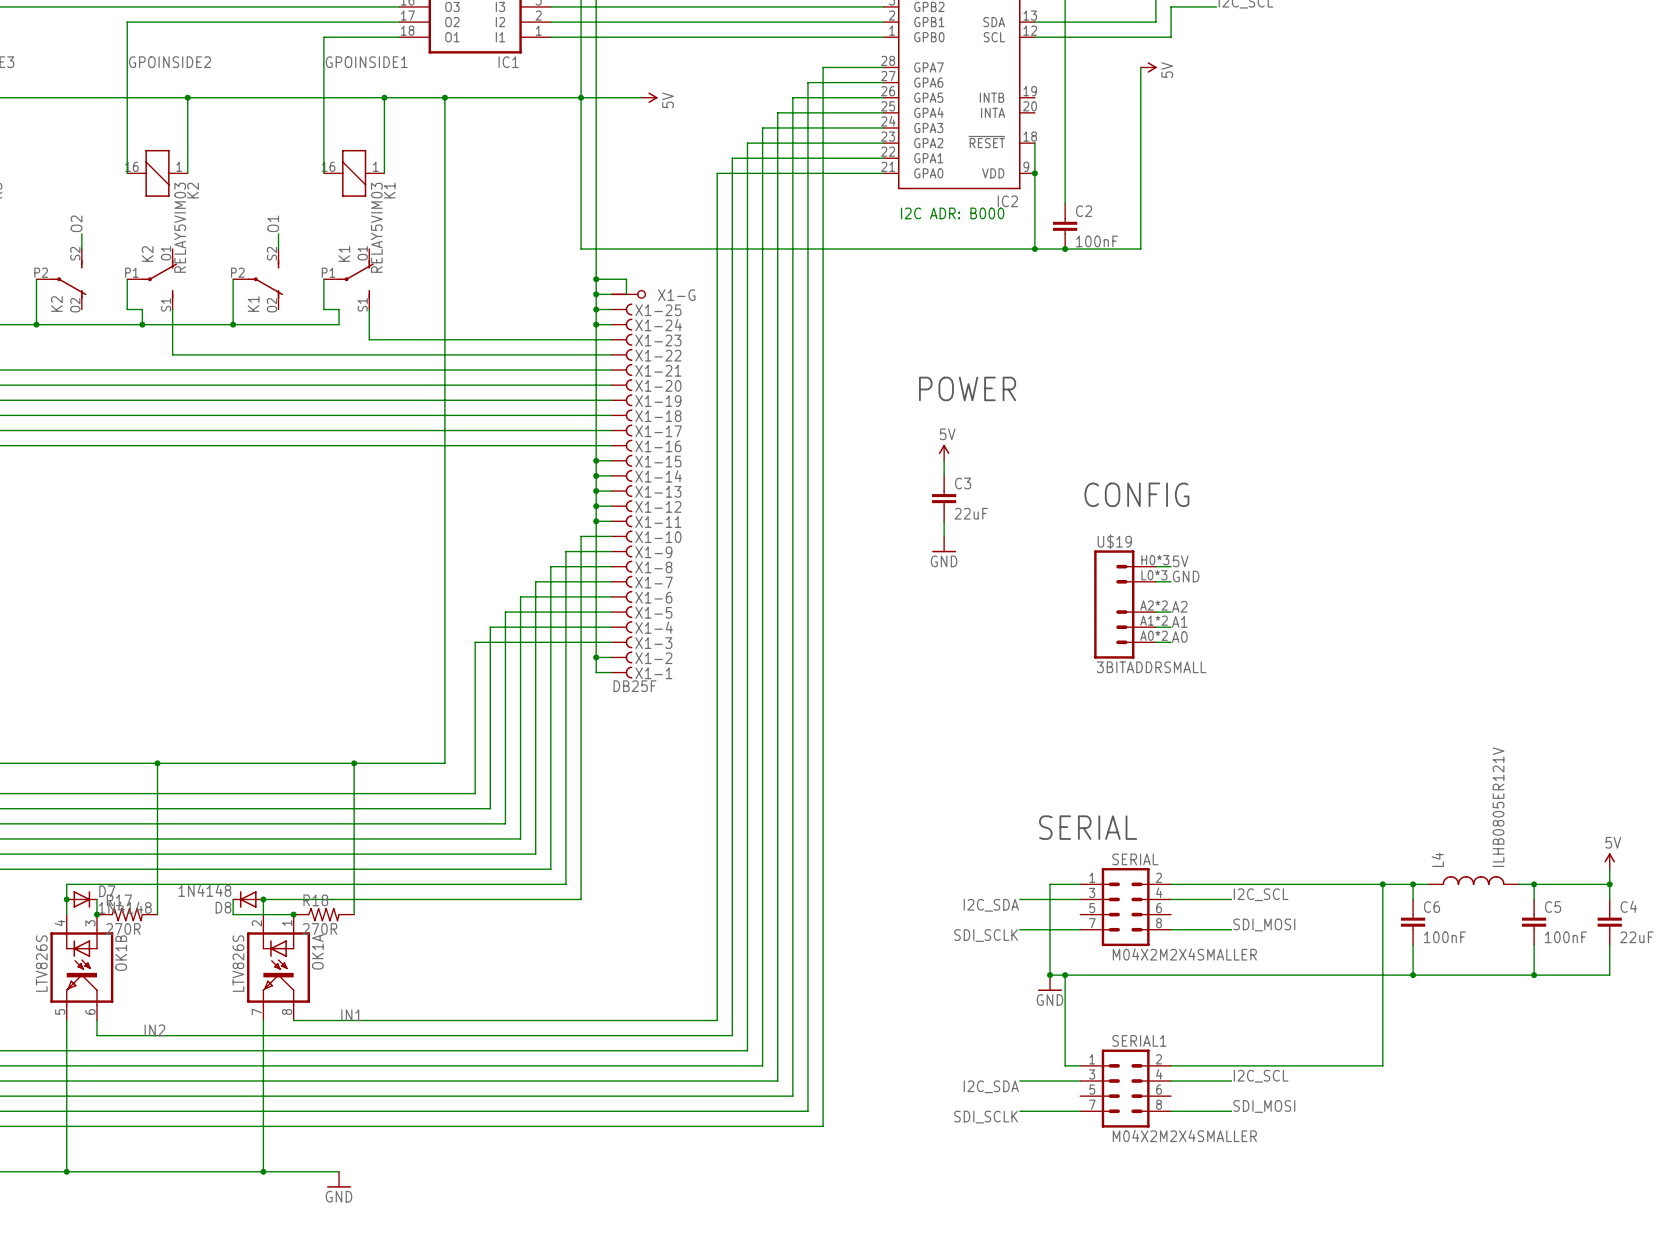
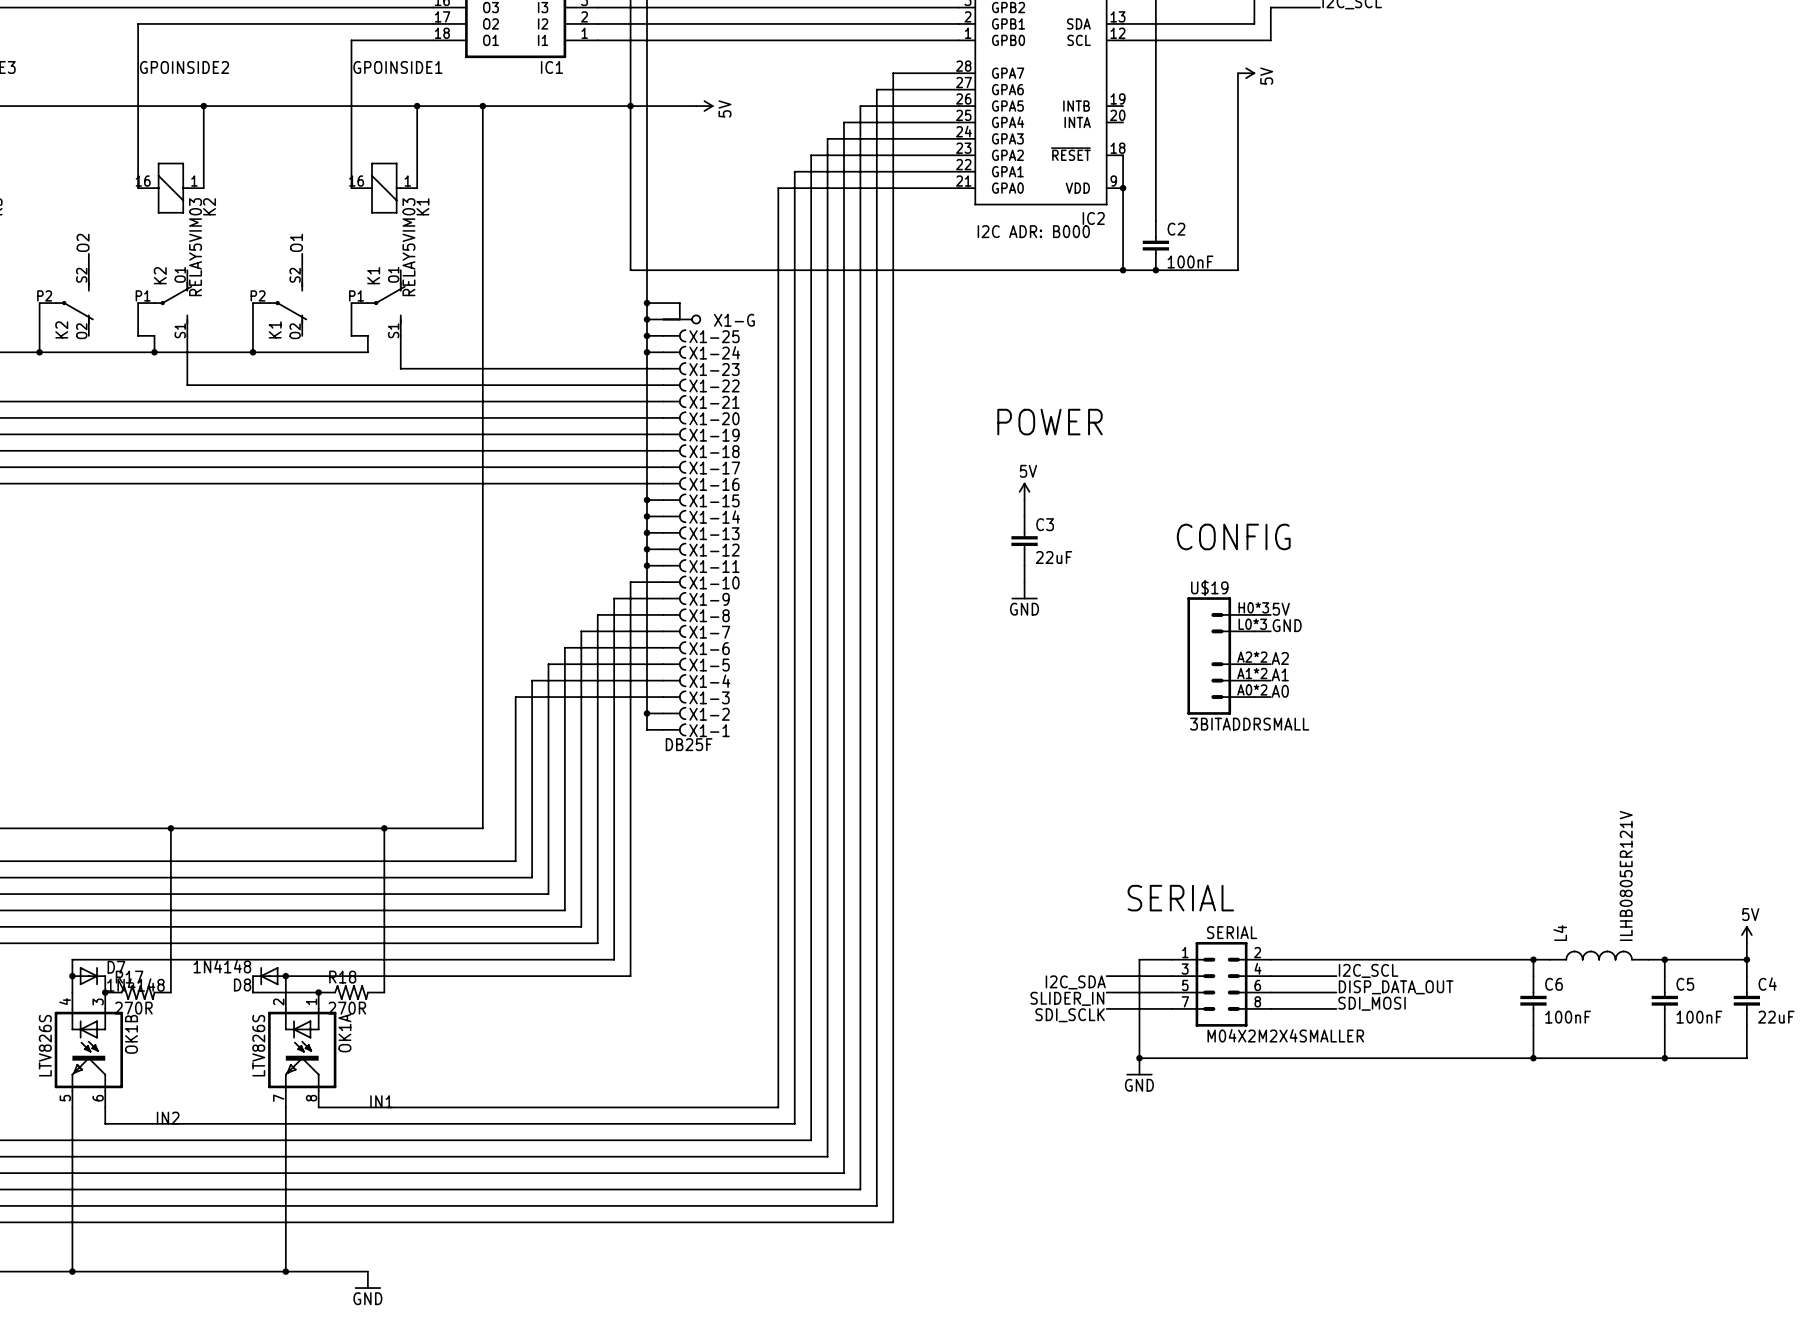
wire: (1382, 884) (1382, 1065) (1171, 1065) -> none
junction: (1382, 884) -> none
label: none -> DISP_DATA_OUT (1396, 987)
wire: none -> (1106, 992) (1172, 992)
wire: none -> (1270, 992) (1336, 992)
label: none -> SLIDER_IN (1067, 998)
wire: (1065, 975) (1065, 1065) (1080, 1065) -> none
junction: (1065, 975) -> none
label: I2C_SCL (1261, 1076) -> none
wire: (1019, 1081) (1080, 1081) -> none
wire: (1171, 1081) (1231, 1081) -> none
label: I2C_SDA (991, 1086) -> none
SERIAL1: M04X2M2X4SMALLER (1125, 1088) -> none
label: SDI_MOSI (1264, 1106) -> none
wire: (1019, 1111) (1080, 1111) -> none
wire: (1171, 1111) (1231, 1111) -> none
label: SDI_SCLK (986, 1117) -> none

